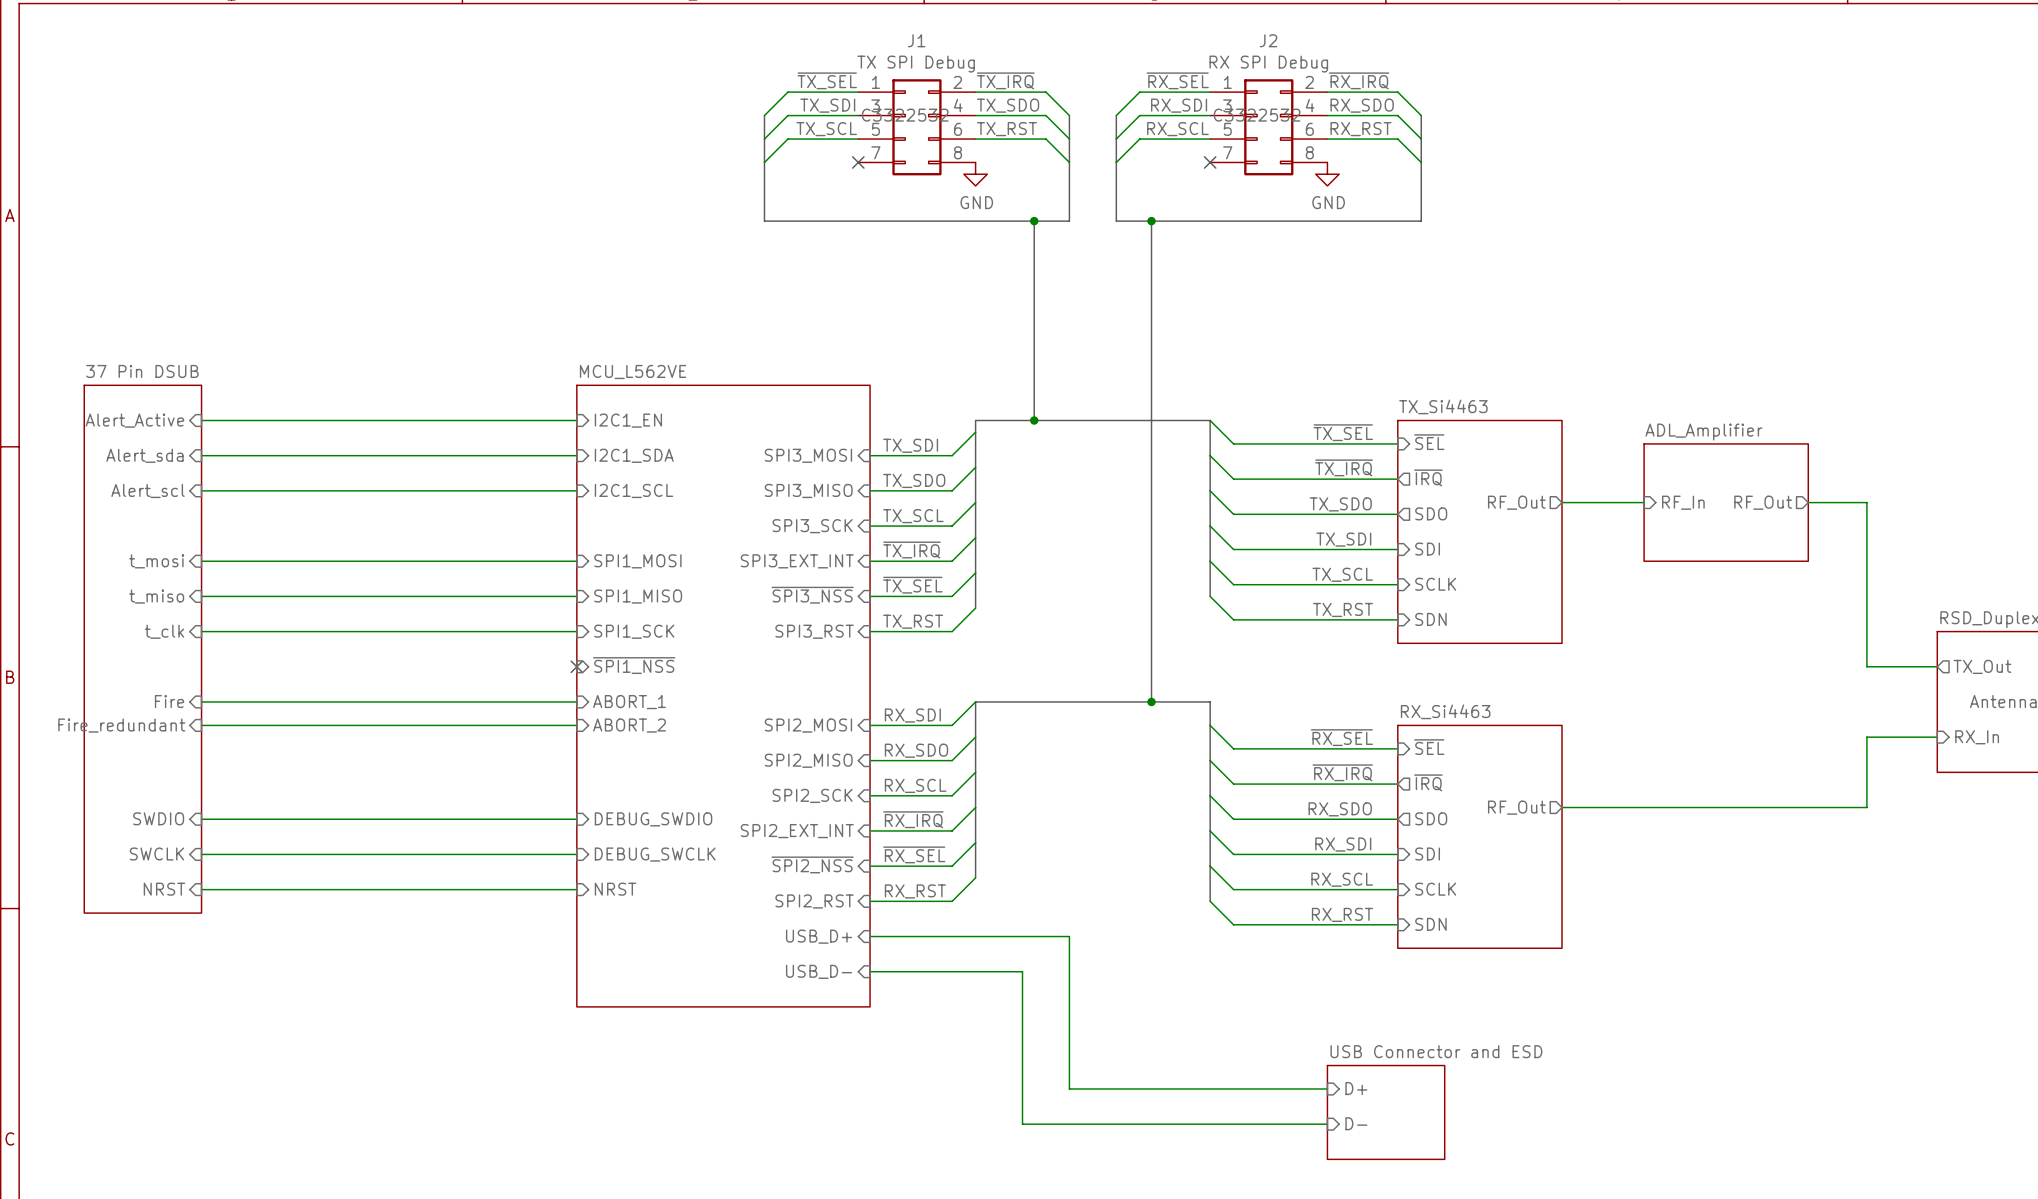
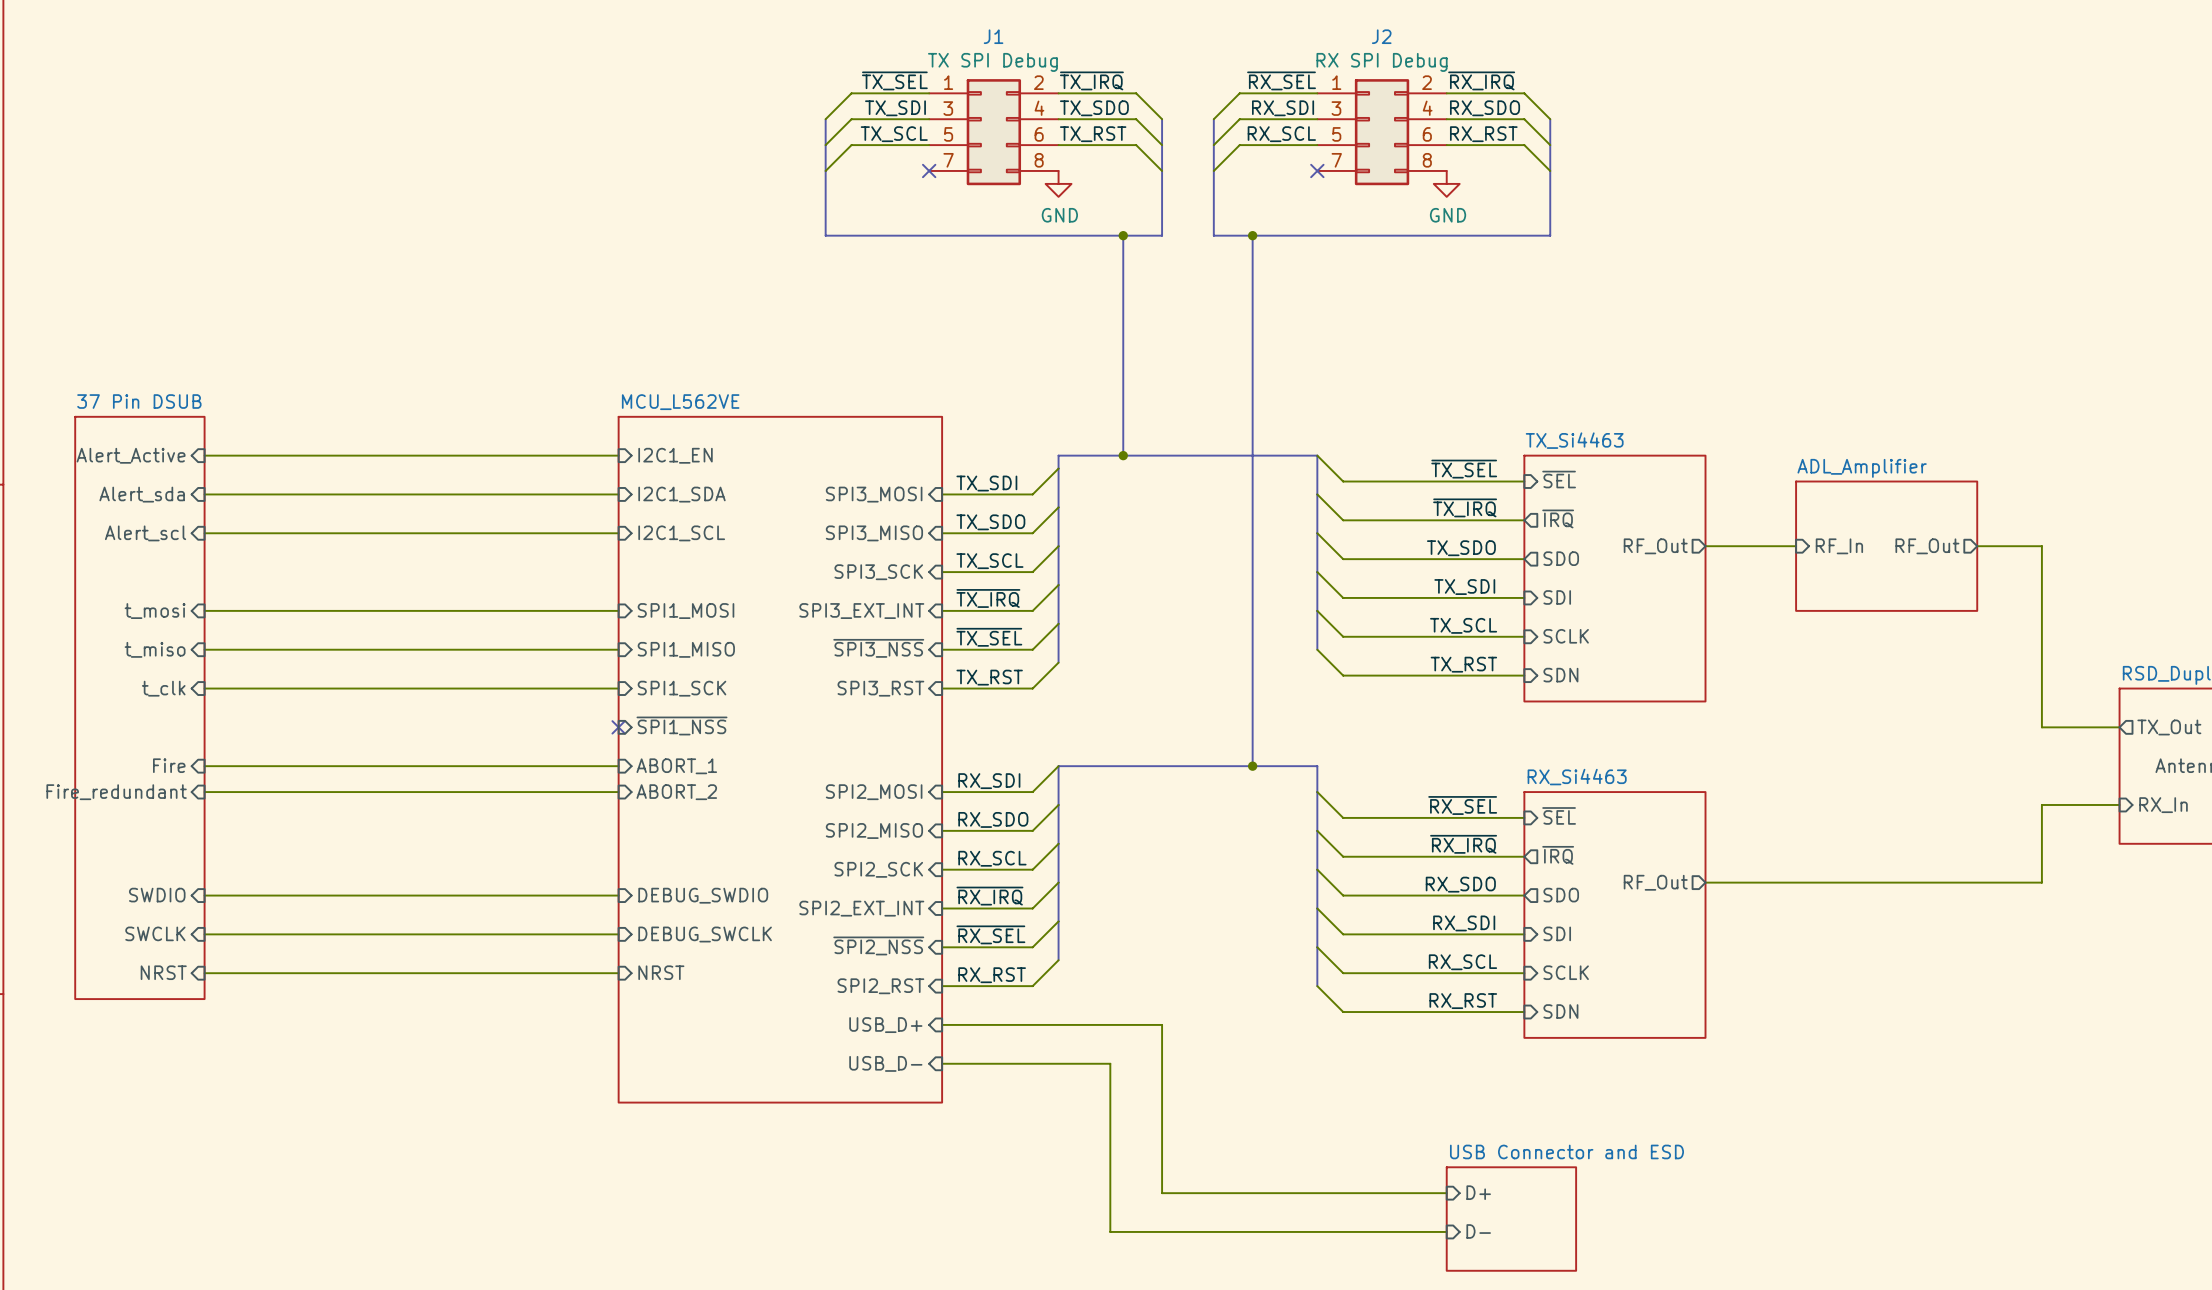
J1 text: C3322532 (905, 115) -> none
J2 text: C3322532 (1257, 115) -> none

